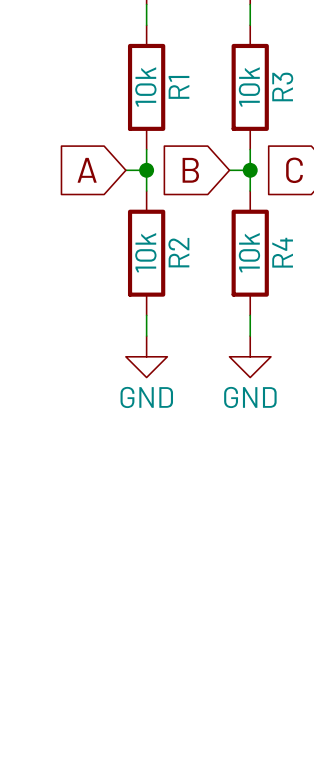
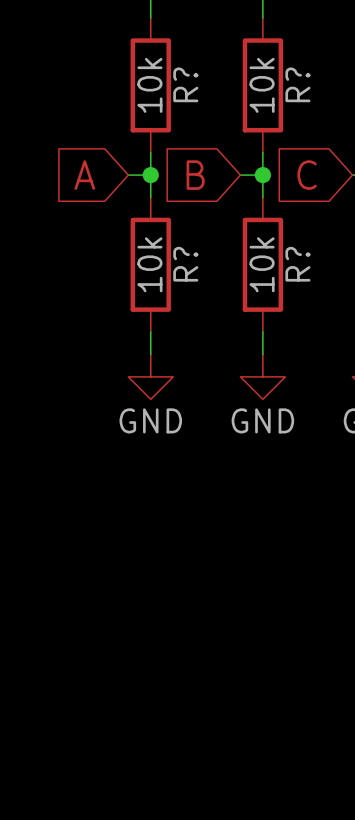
R3 name: R3 (282, 86) -> R? (297, 84)
R1 name: R1 (179, 87) -> R? (185, 84)
R2 name: R2 (178, 252) -> R? (185, 264)
R4 name: R4 (282, 252) -> R? (297, 264)

